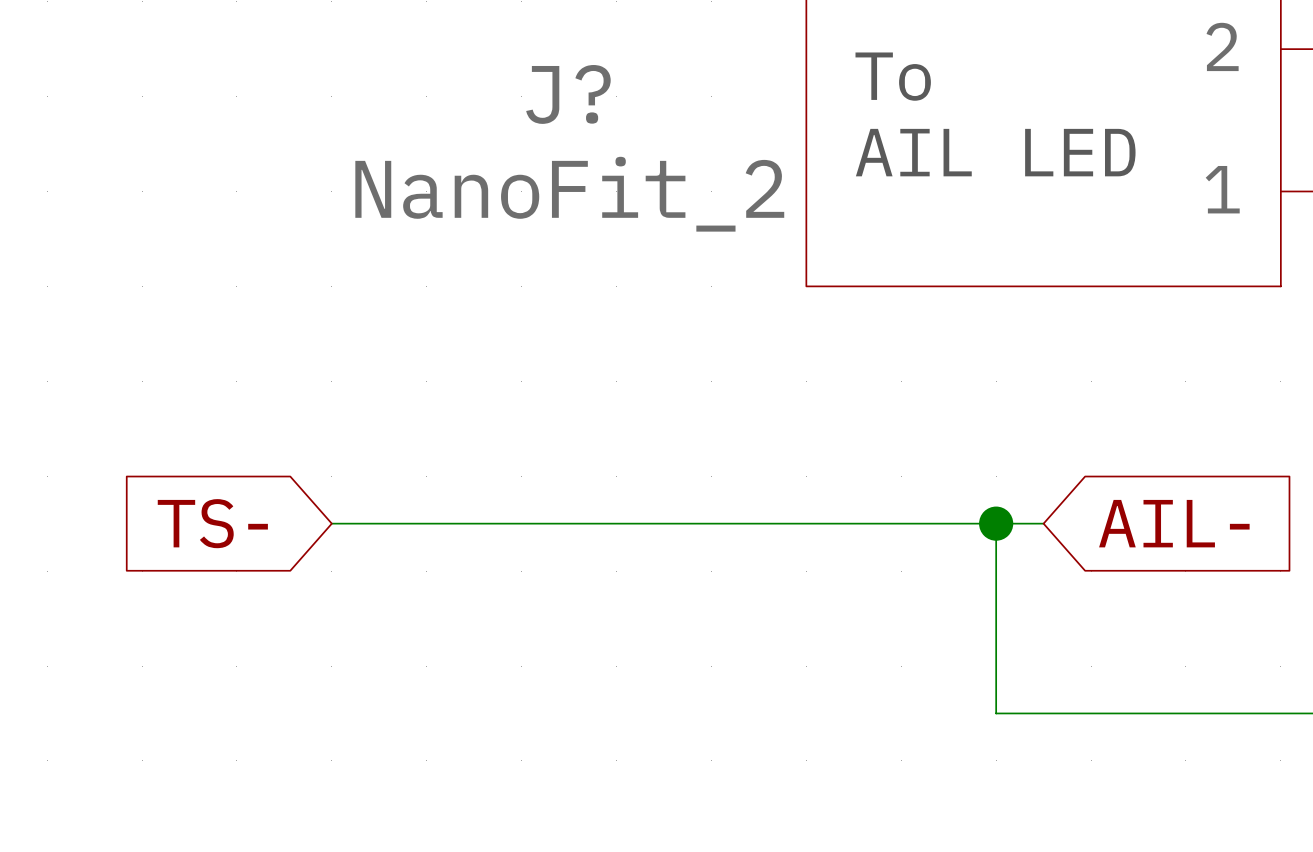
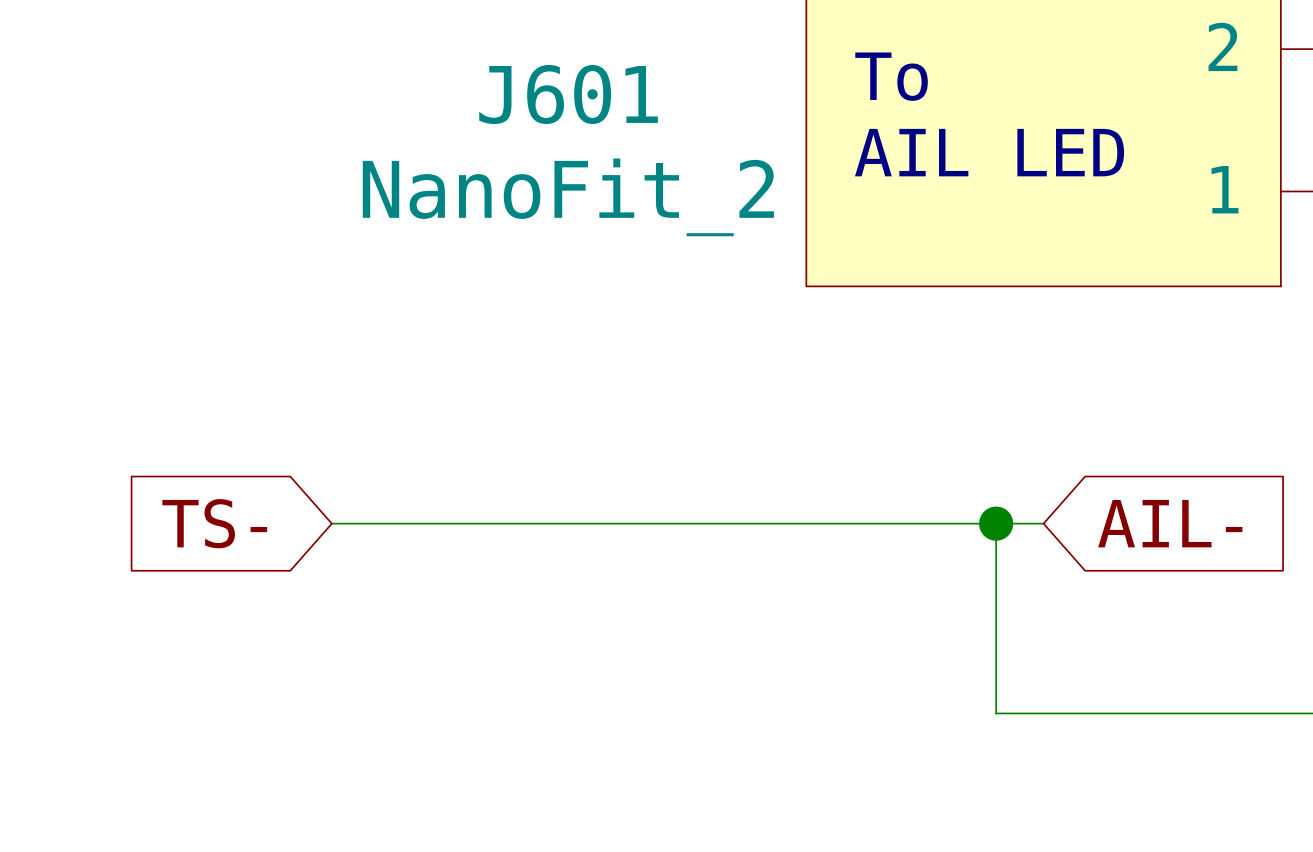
J? name: J? (568, 94) -> J601 (568, 94)

